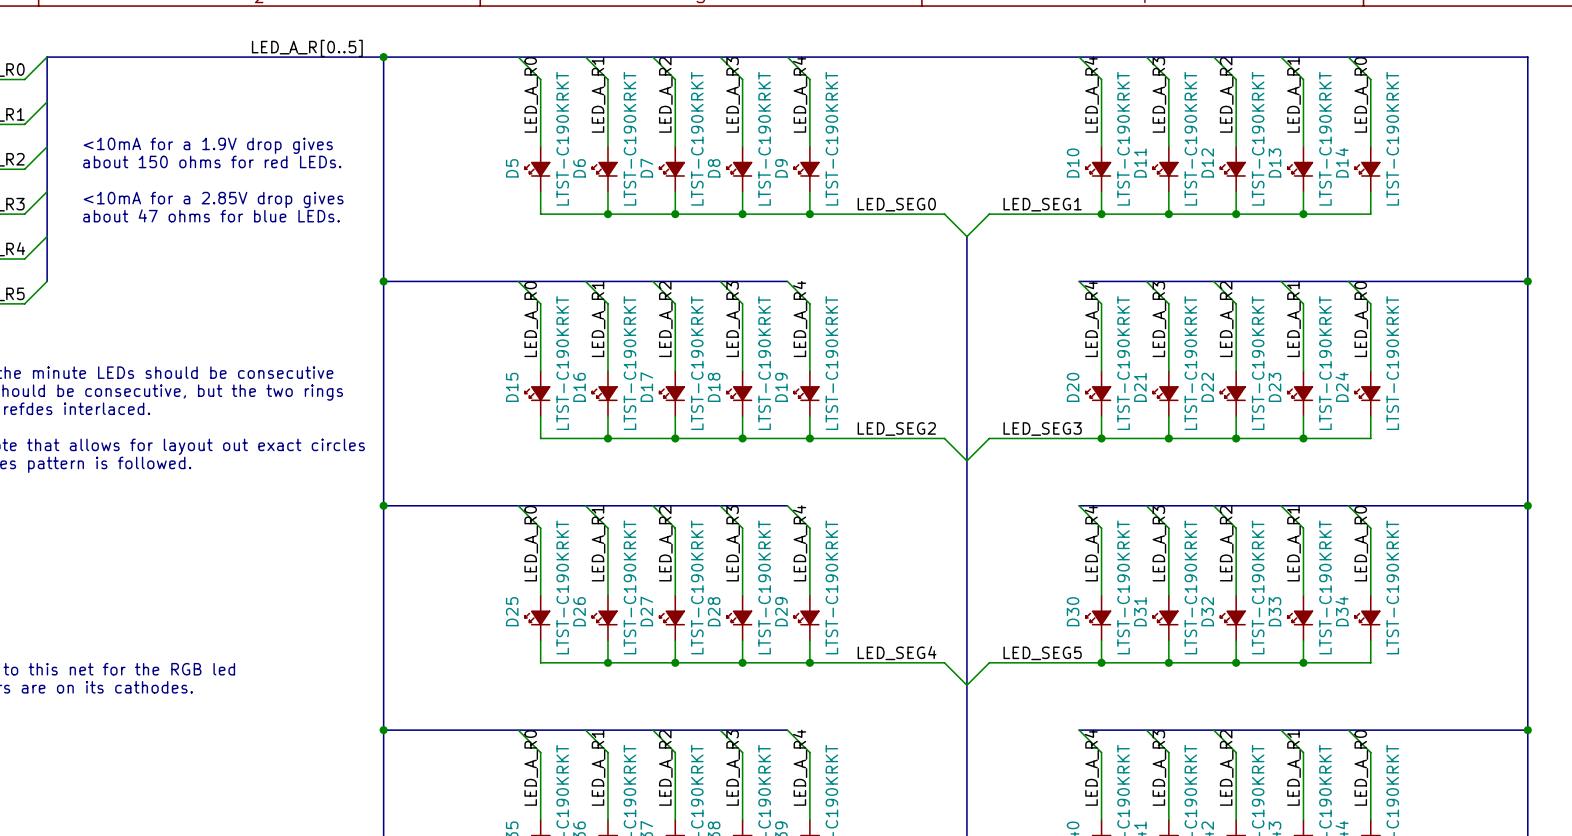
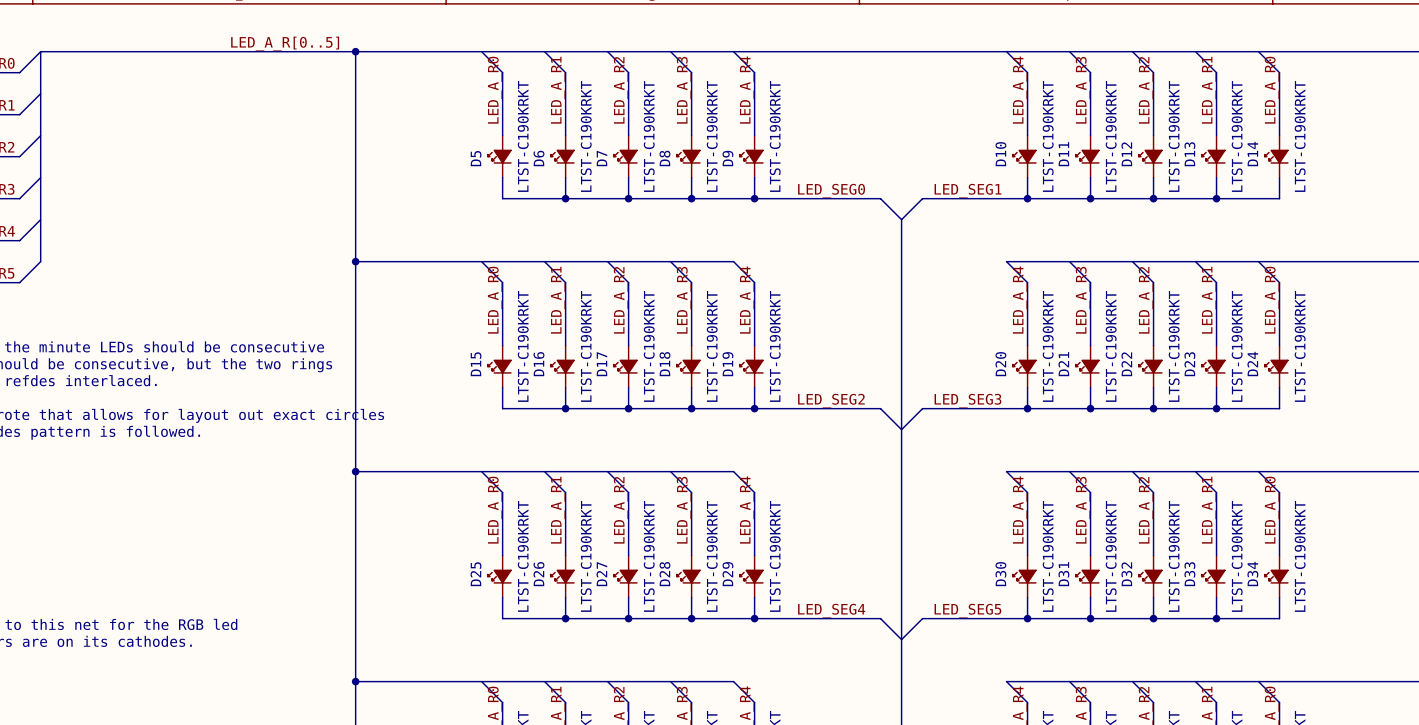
text: <10mA for a 1.9V drop gives (208, 145) -> none
text: about 150 ohms for red LEDs. (212, 161) -> none
text: <10mA for a 2.85V drop gives (213, 199) -> none
text: about 47 ohms for blue LEDs. (211, 215) -> none

